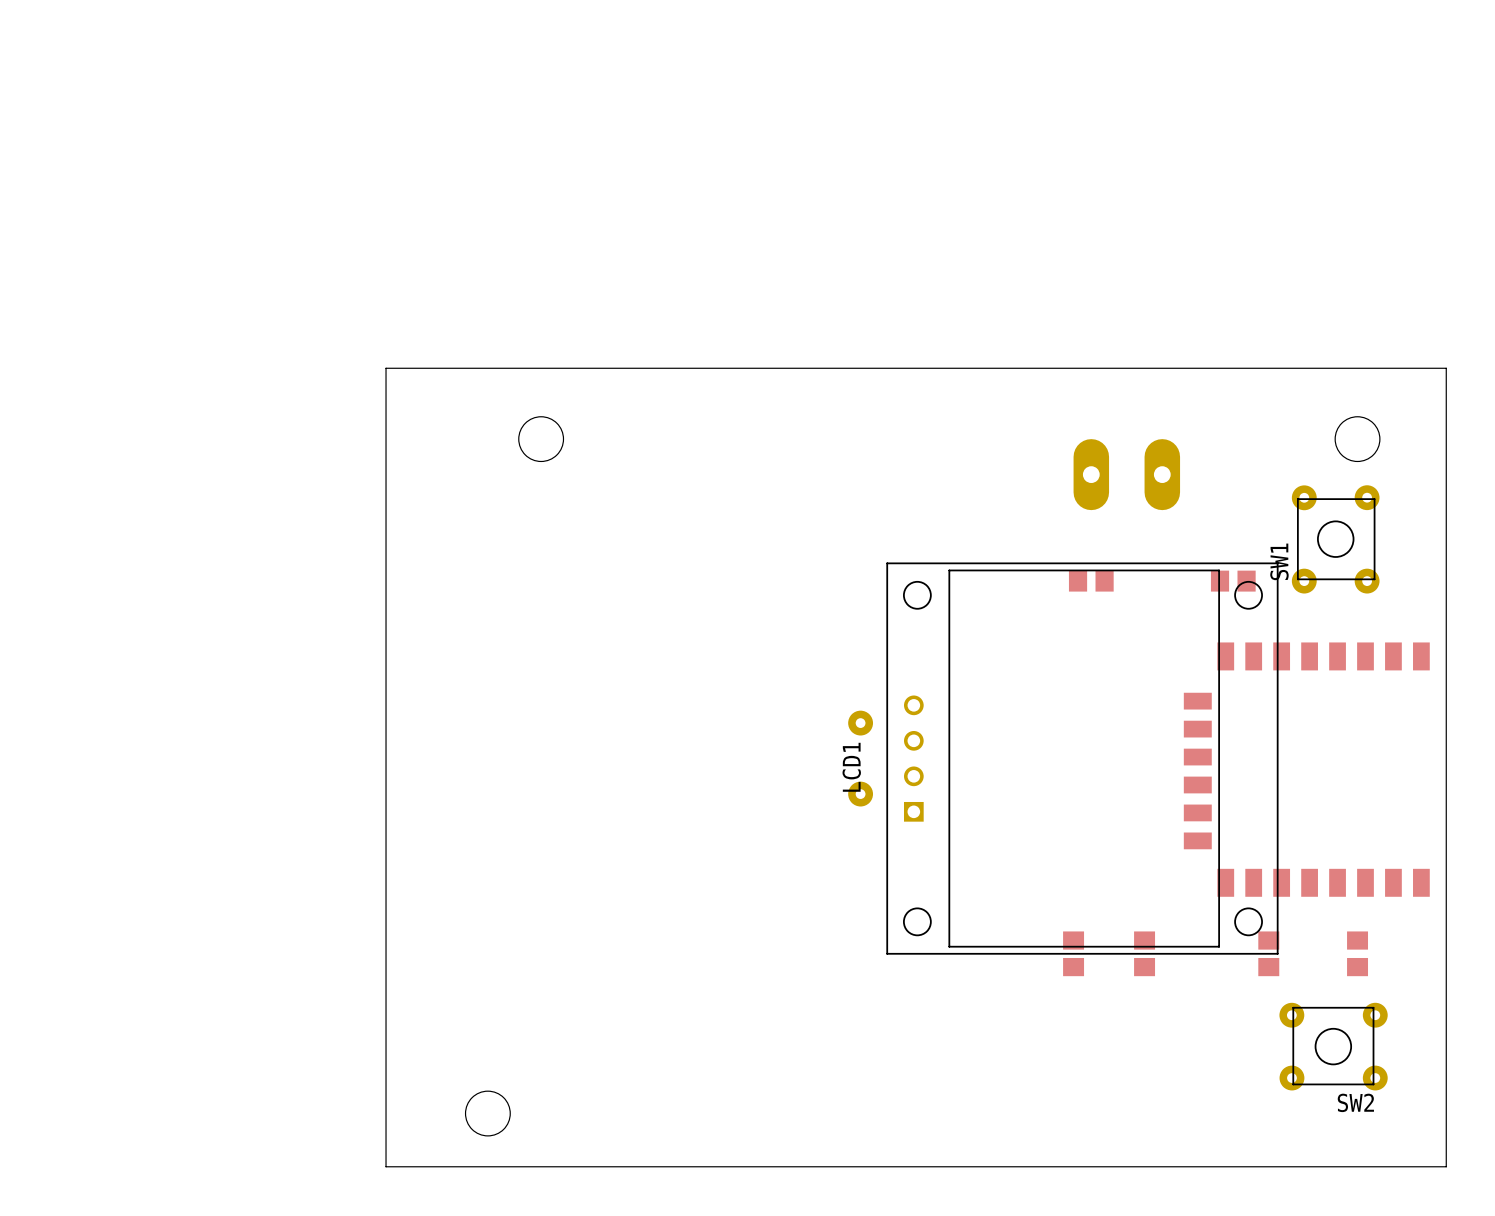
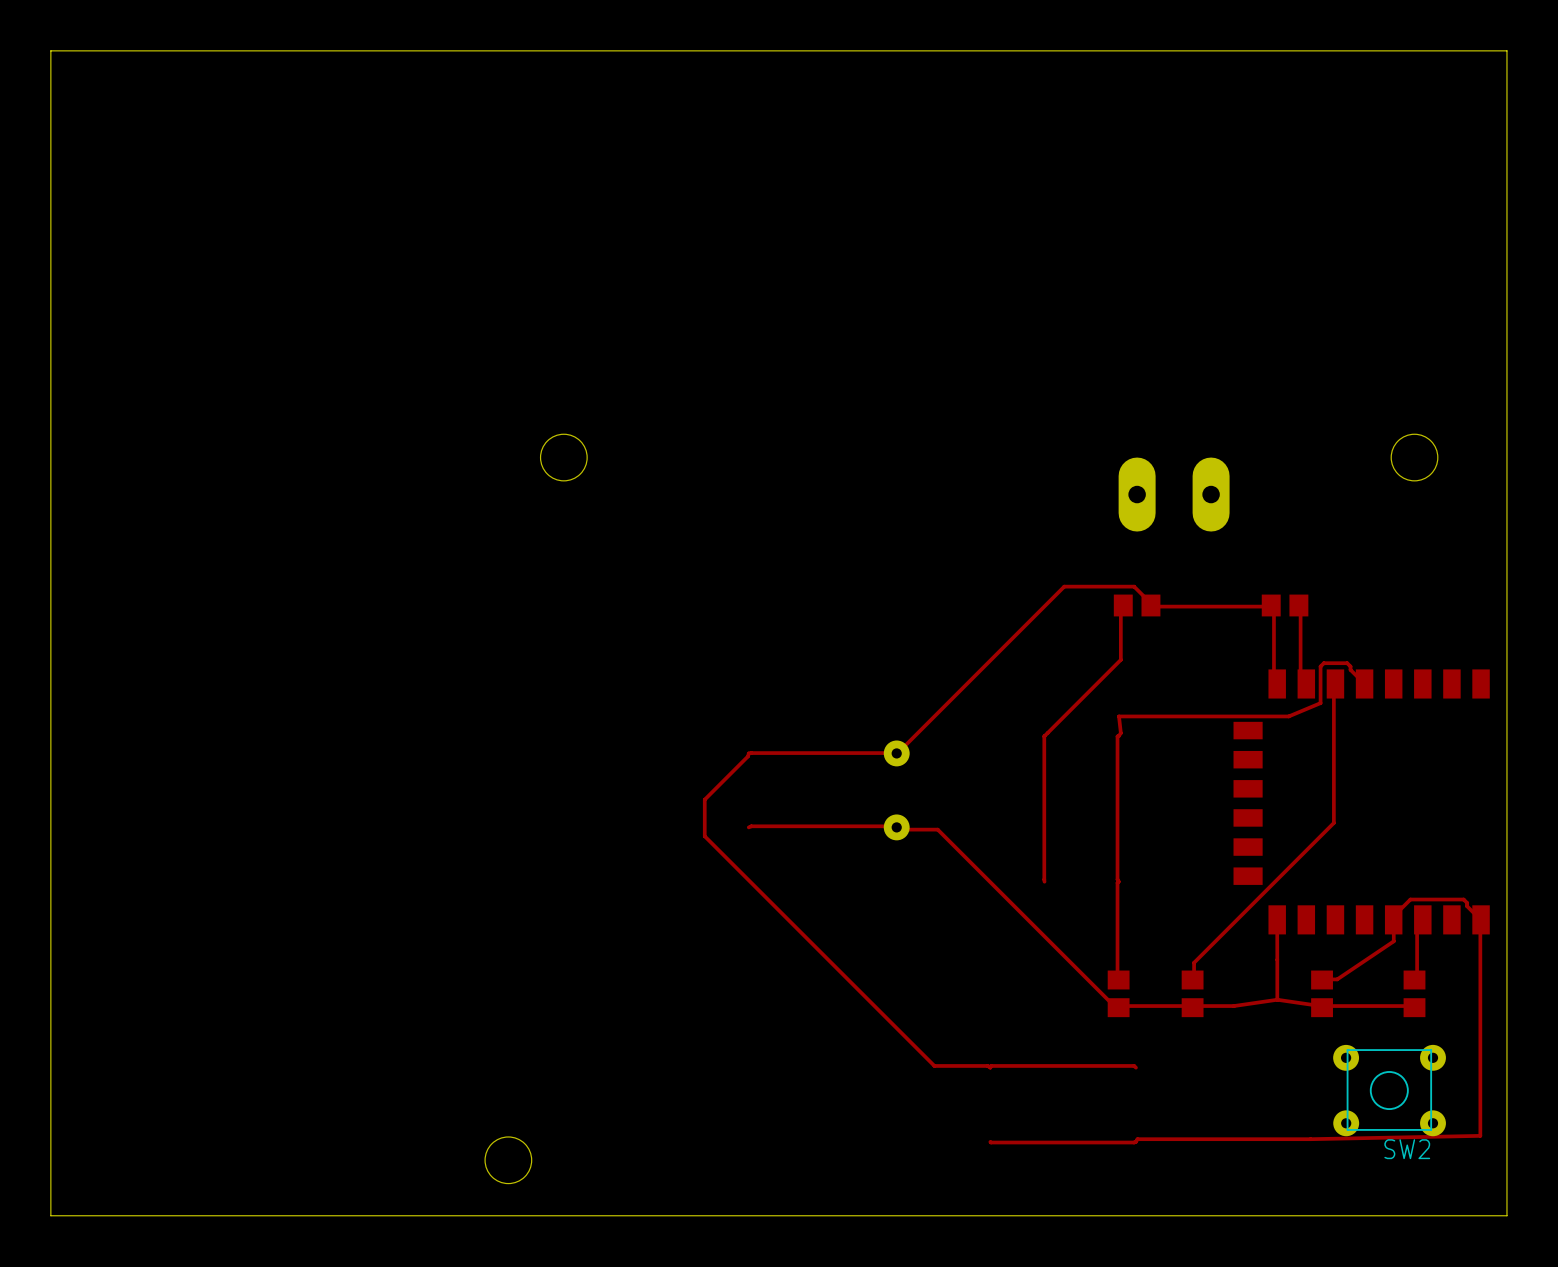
board edge: (1446, 368) (386, 368) (386, 1166) -> (1506, 383) (1506, 50) (50, 50) (50, 1215) (402, 1215)
SW1: (1335, 539) -> none
top track: none -> (1123, 605) (1120, 606) (1120, 659) (1044, 736) (1044, 881)
top track: none -> (1298, 605) (1300, 606) (1300, 679) (1306, 683)
top track: none -> (1277, 683) (1273, 683) (1273, 606) (1154, 606) (1134, 586) (1064, 586) (897, 753) (748, 753) (748, 756) (704, 799) (704, 836) (934, 1065) (987, 1065) (990, 1067) (991, 1065) (1134, 1065) (1135, 1067)
top track: none -> (1335, 683) (1333, 686) (1333, 822) (1194, 962) (1192, 980)
top track: none -> (1364, 683) (1350, 669) (1347, 663) (1323, 663) (1320, 666) (1320, 703) (1288, 716) (1119, 716) (1120, 733) (1117, 736) (1118, 980)
LCD1: (1082, 758) -> none
top track: none -> (748, 827) (894, 826) (897, 829) (937, 829) (1117, 1009) (1120, 1006) (1190, 1006) (1192, 1007) (1194, 1006) (1234, 1006) (1277, 999)
top track: none -> (1277, 919) (1277, 999)
top track: none -> (1422, 919) (1417, 926) (1417, 979) (1414, 980)
top track: none -> (1322, 980) (1337, 979) (1393, 941) (1393, 919) (1390, 919) (1410, 899) (1463, 899) (1467, 906) (1481, 919) (1480, 1135) (1310, 1139) (1137, 1139) (1134, 1142) (990, 1141)
top track: none -> (1277, 999) (1322, 1007)
top track: none -> (1413, 1006) (1323, 1006)

